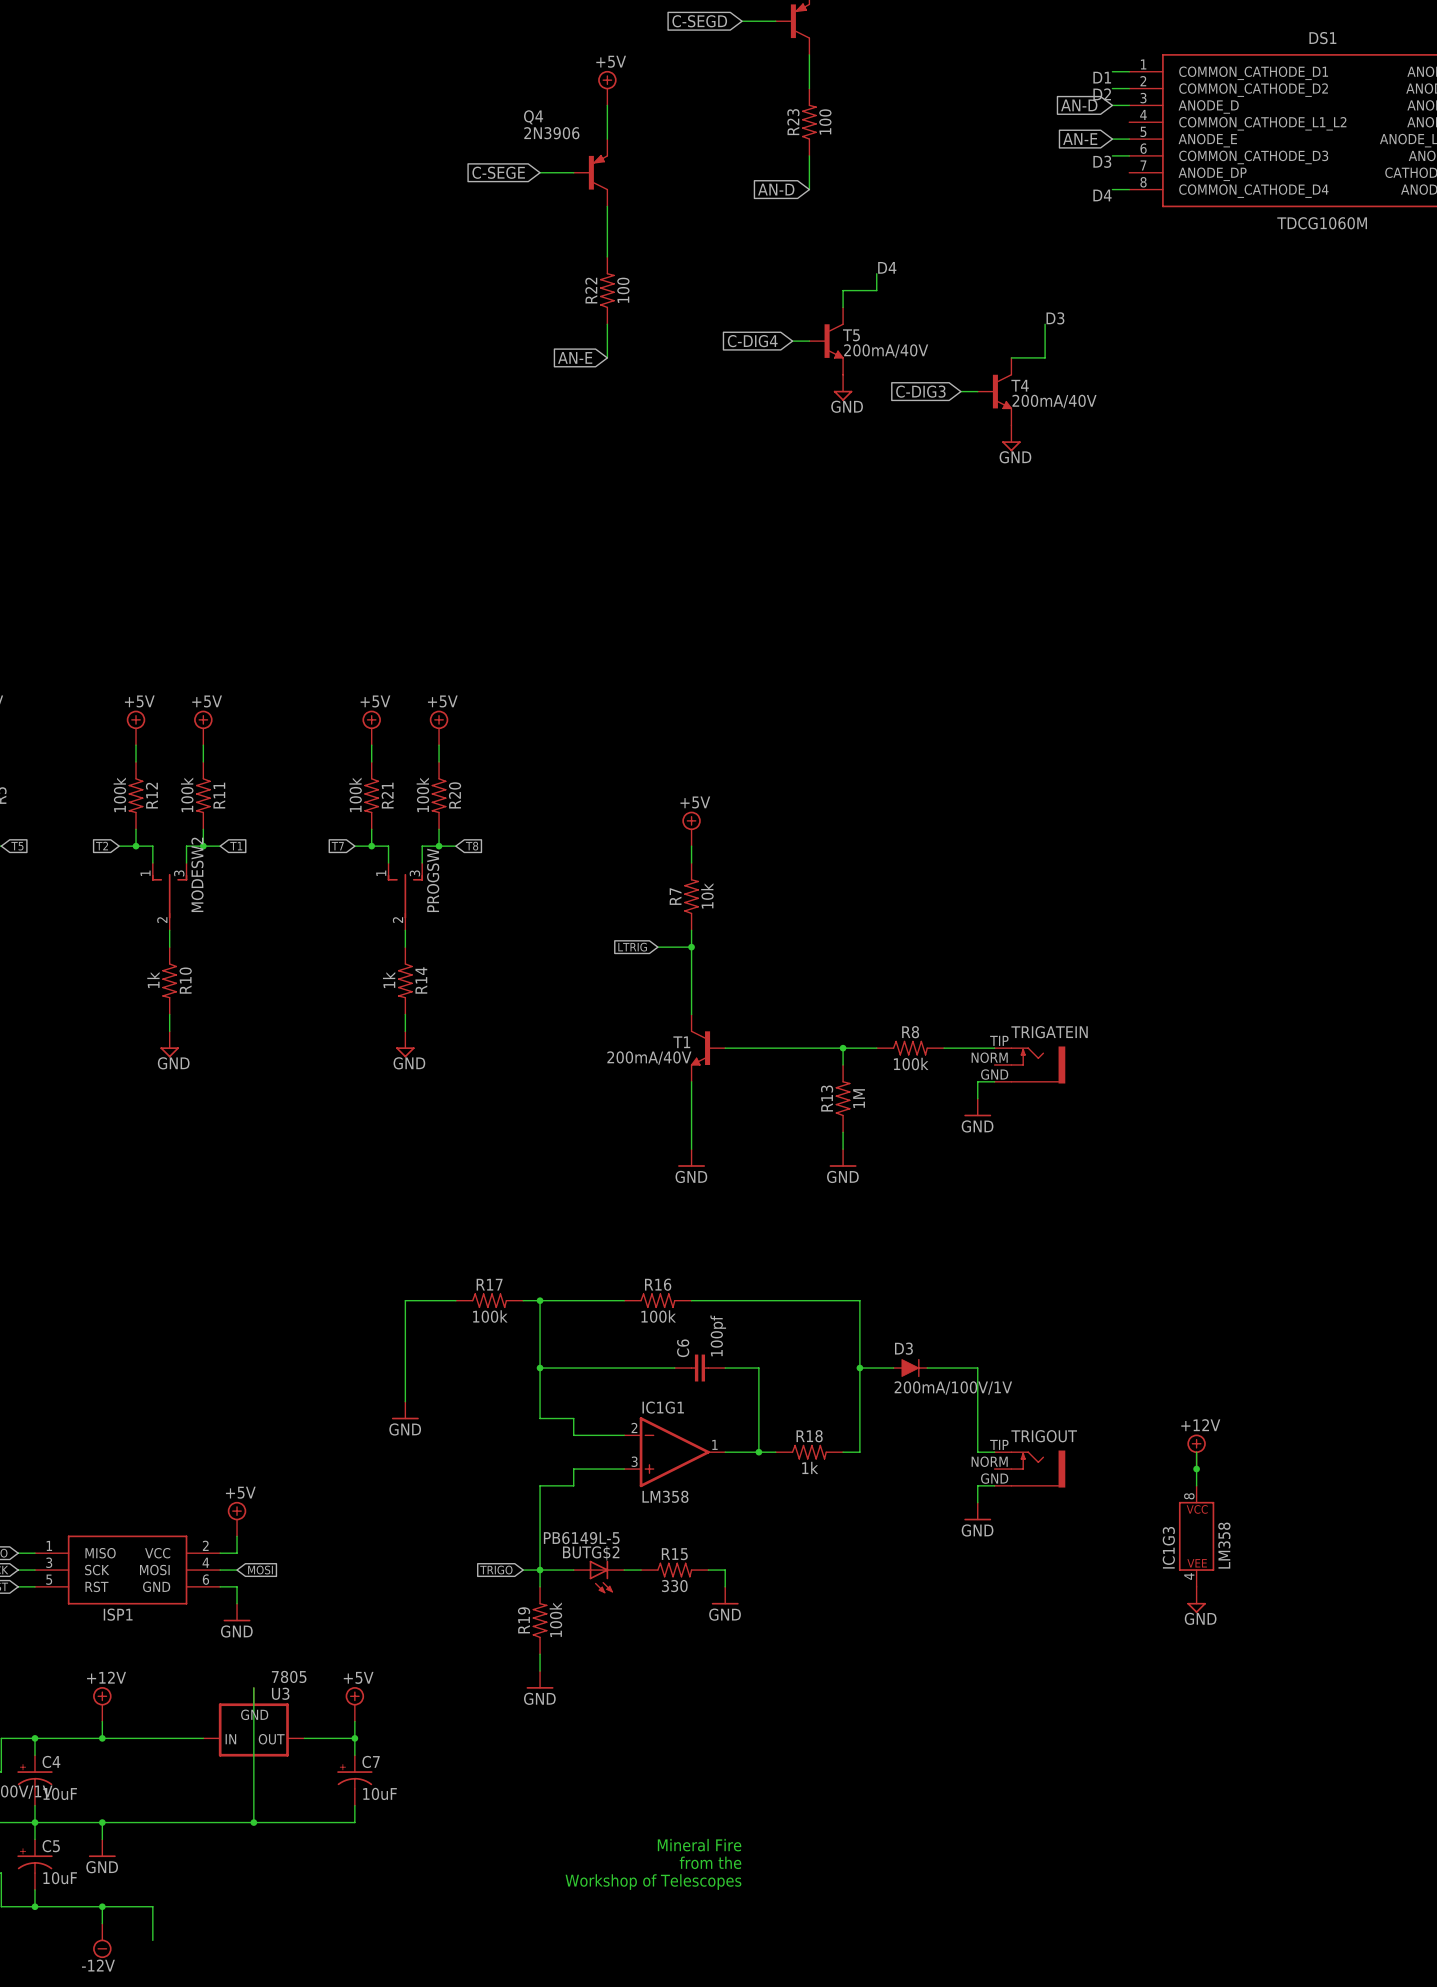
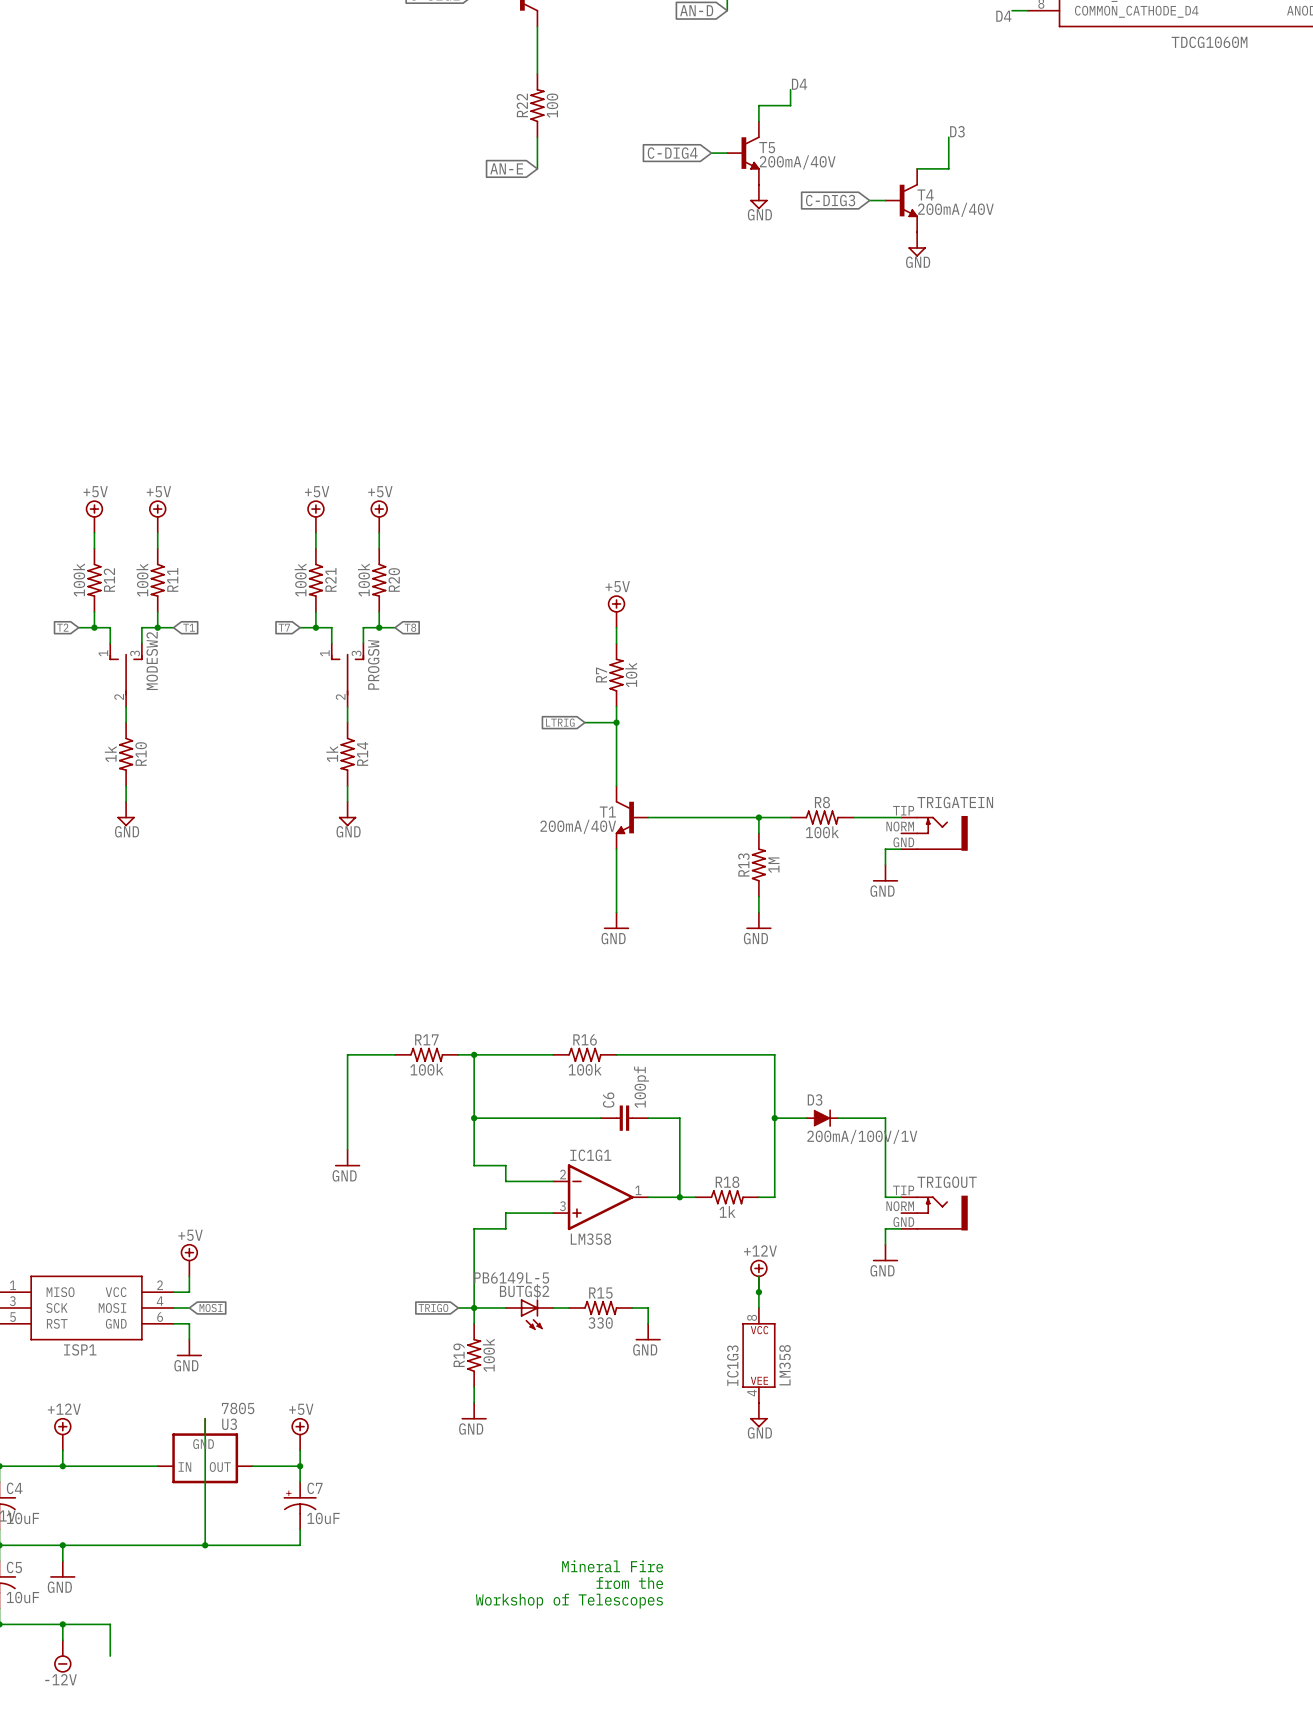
power symbol: +12V (1196, 1451) -> none
wire: (1196, 1452) (1196, 1485) -> none
junction: (1196, 1469) -> none
power symbol: none -> +12V (758, 1275)
wire: none -> (758, 1276) (758, 1308)
IC1G3 position: (1196, 1536) -> (758, 1355)
junction: none -> (758, 1292)
power symbol: GND (1196, 1599) -> none
power symbol: none -> GND (758, 1415)

